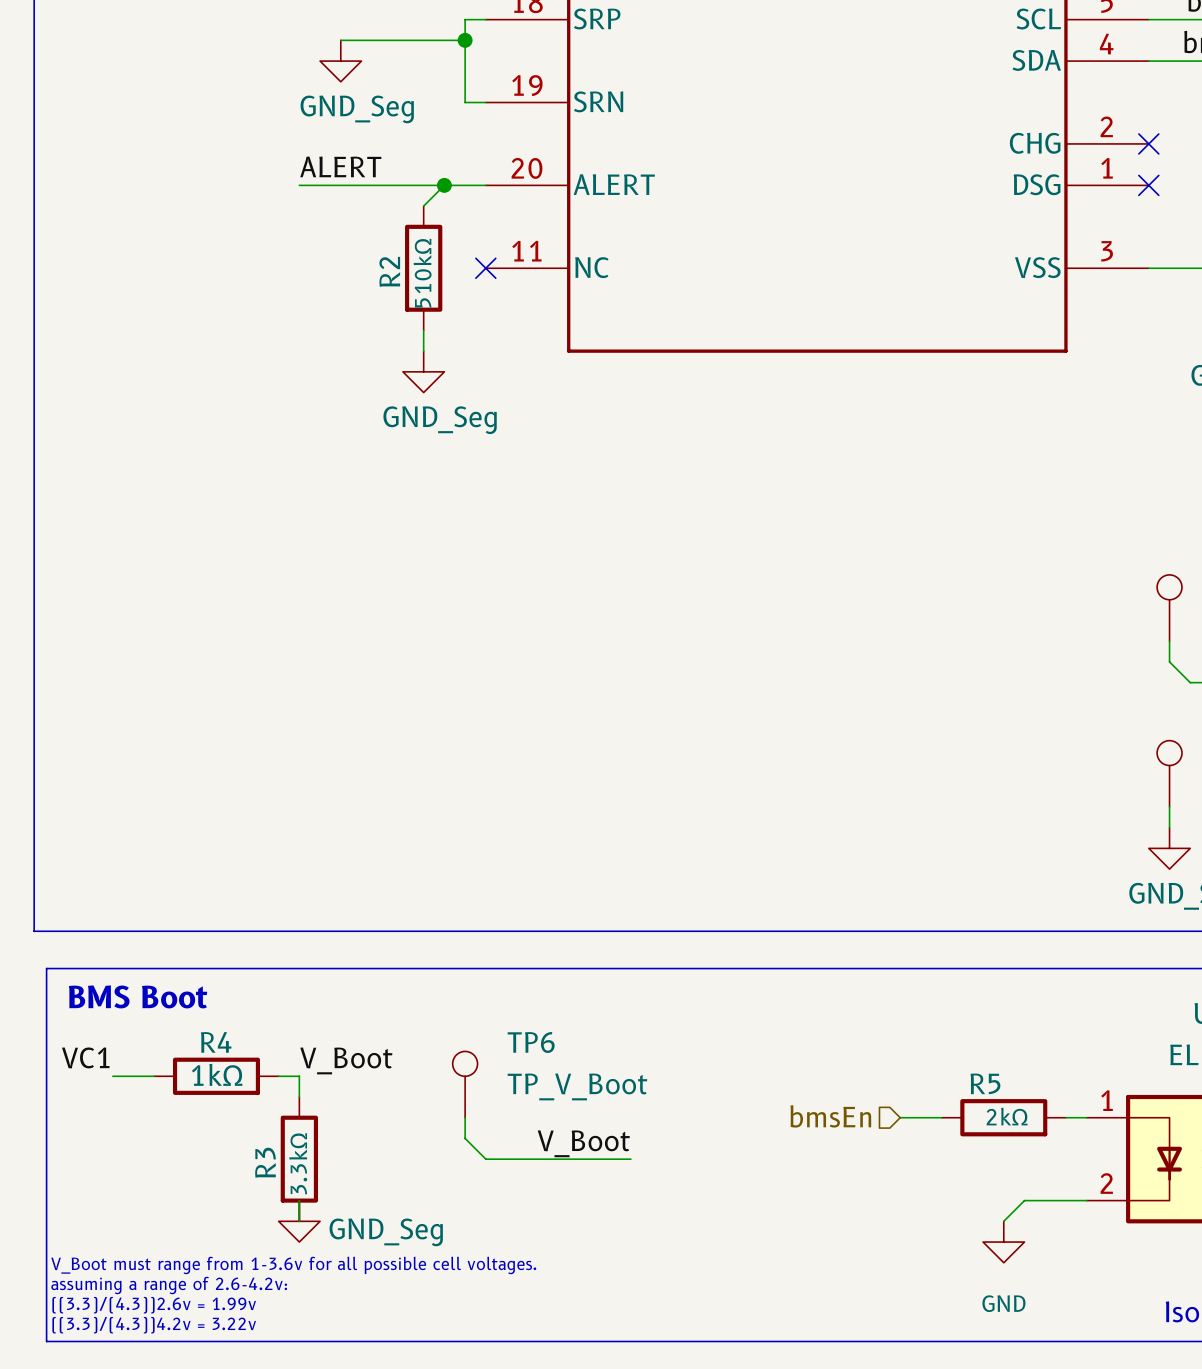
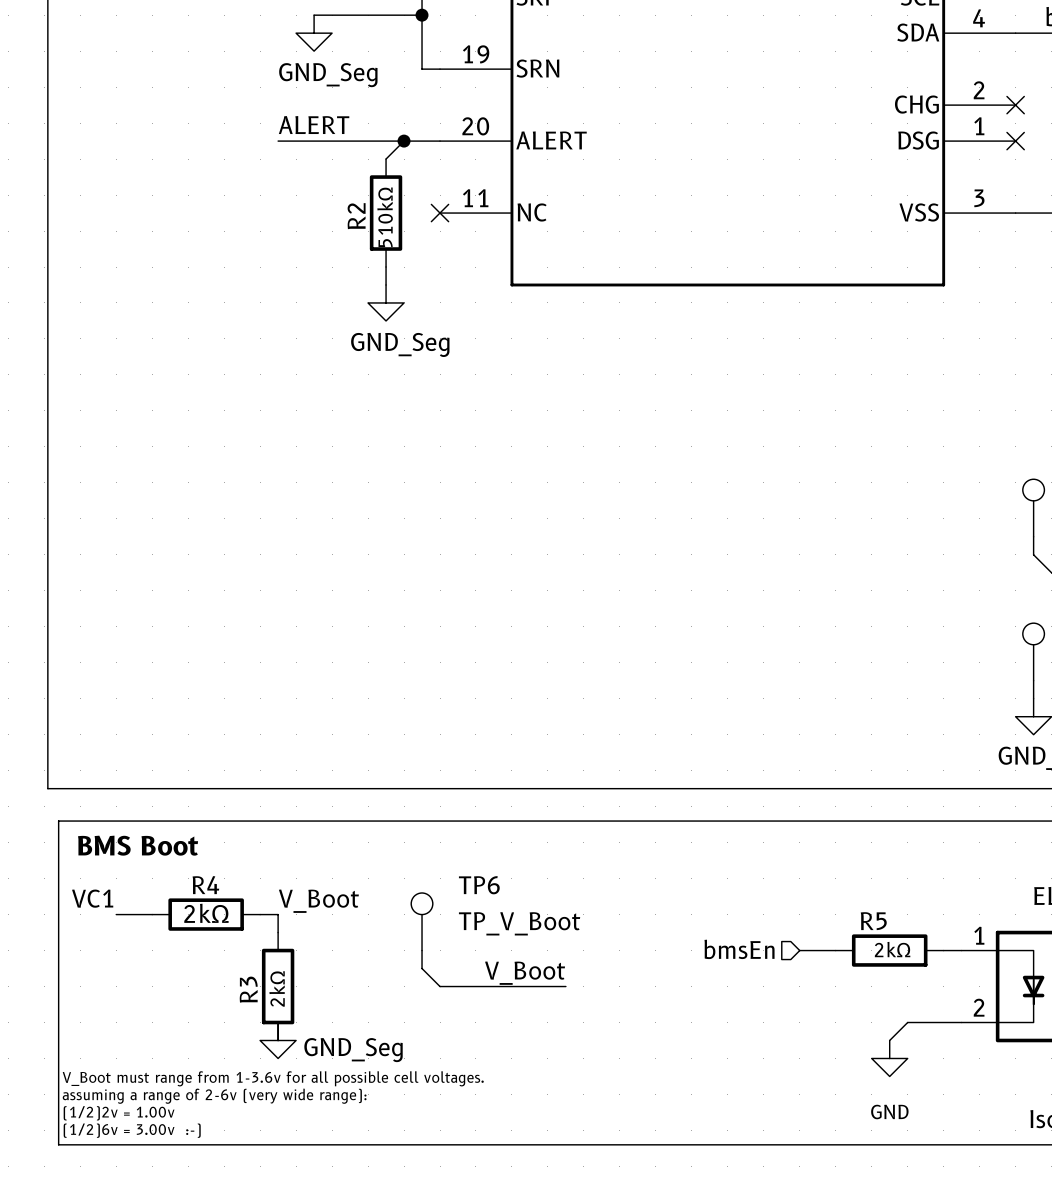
R4 value: 1kΩ (217, 1074) -> 2kΩ (206, 913)
R3 value: 3.3kΩ (298, 1163) -> 2kΩ (277, 988)
text: assuming a range of 2.6-4.2v: (169, 1285) -> assuming a range of 2-6v (very wide range): (214, 1096)
text: ((3.3)/(4.3))2.6v = 1.99v (154, 1305) -> (1/2)2v = 1.00v (119, 1113)
text: ((3.3)/(4.3))4.2v = 3.22v (154, 1325) -> (1/2)6v = 3.00v :-) (132, 1130)

